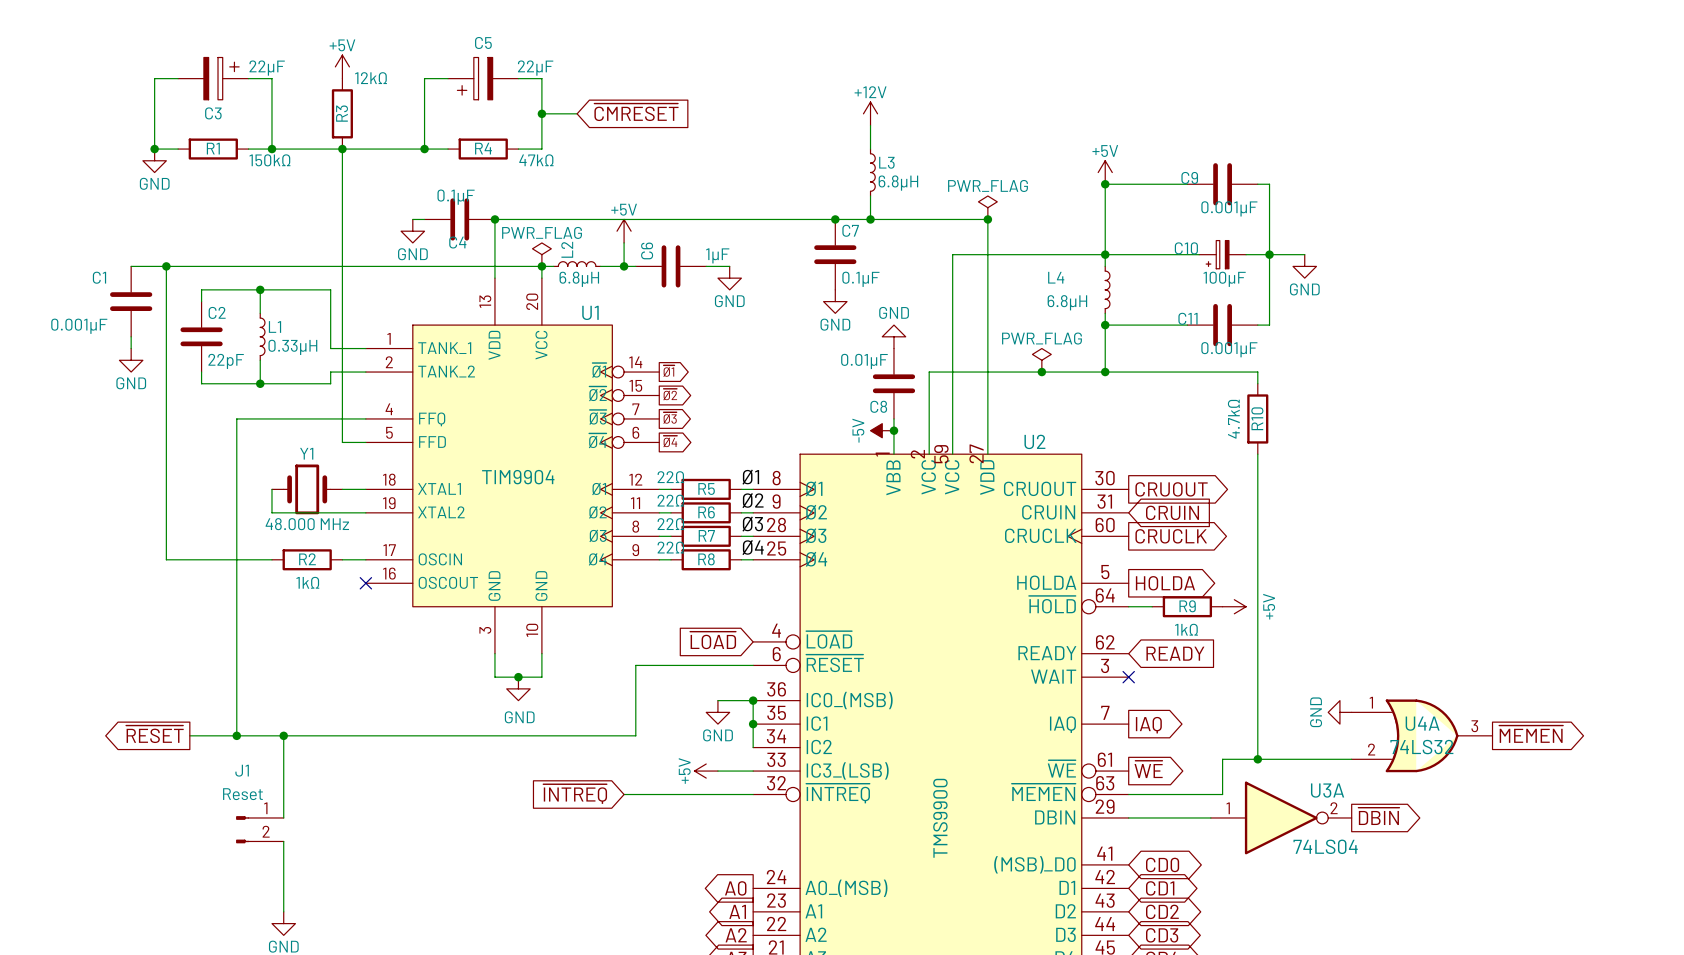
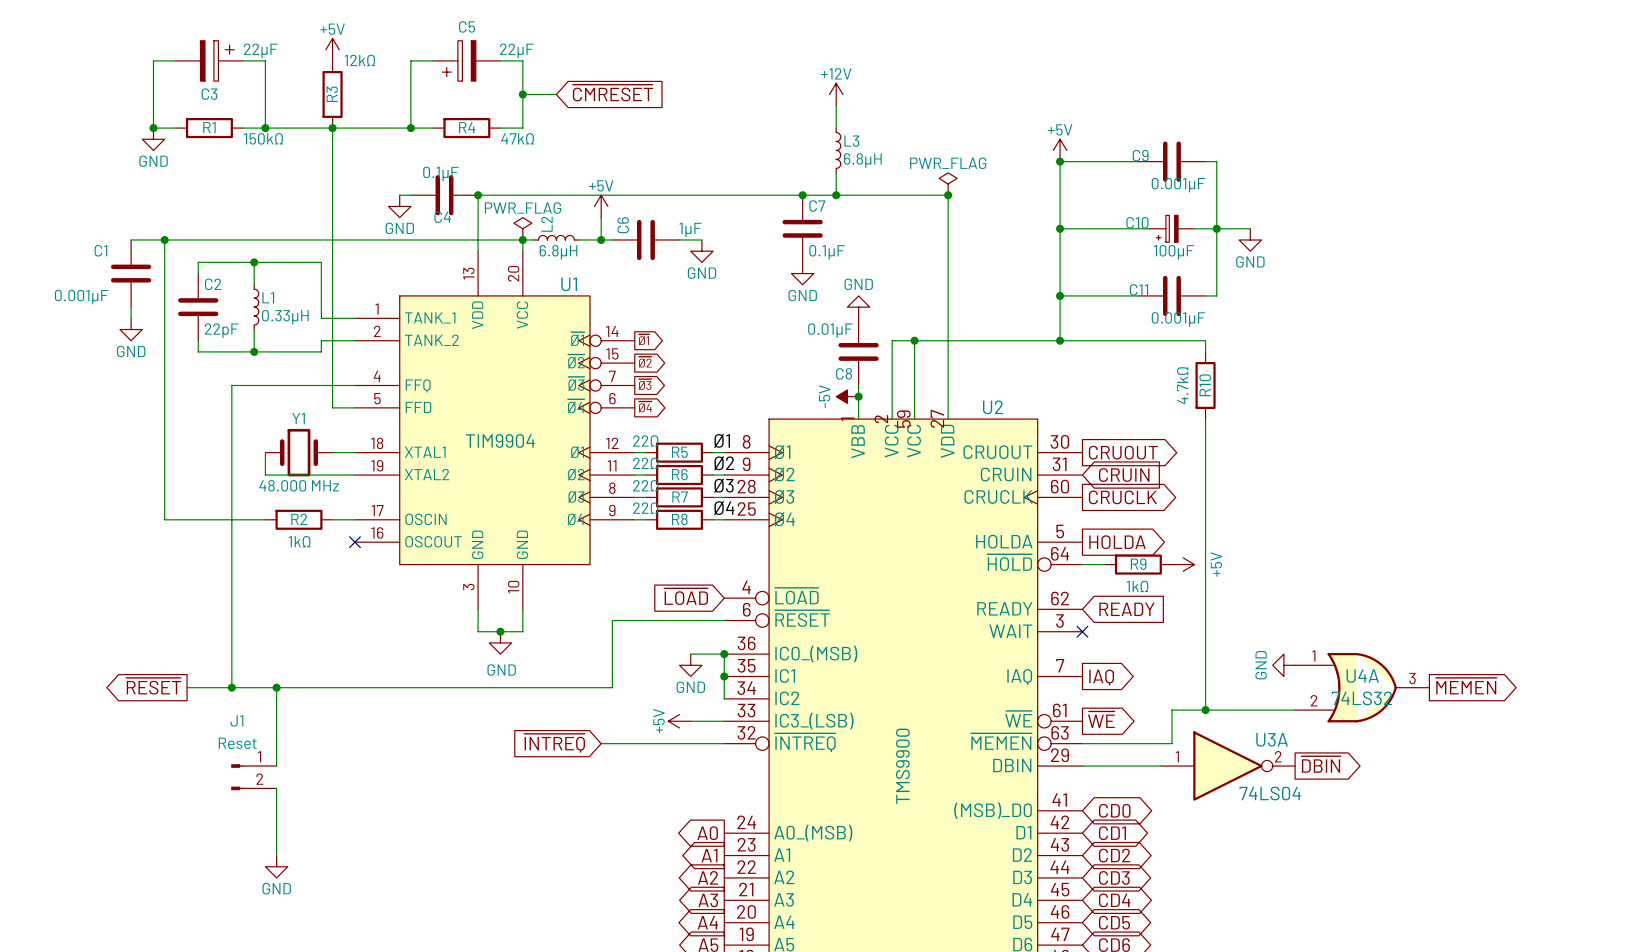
wire: (1105, 254) (952, 254) (952, 372) -> none
wire: none -> (1060, 239) (1060, 284)
L4: 6.8µH (1107, 289) -> none
power symbol: PWR_FLAG (1041, 360) -> none
junction: none -> (914, 340)
junction: (1041, 372) -> none

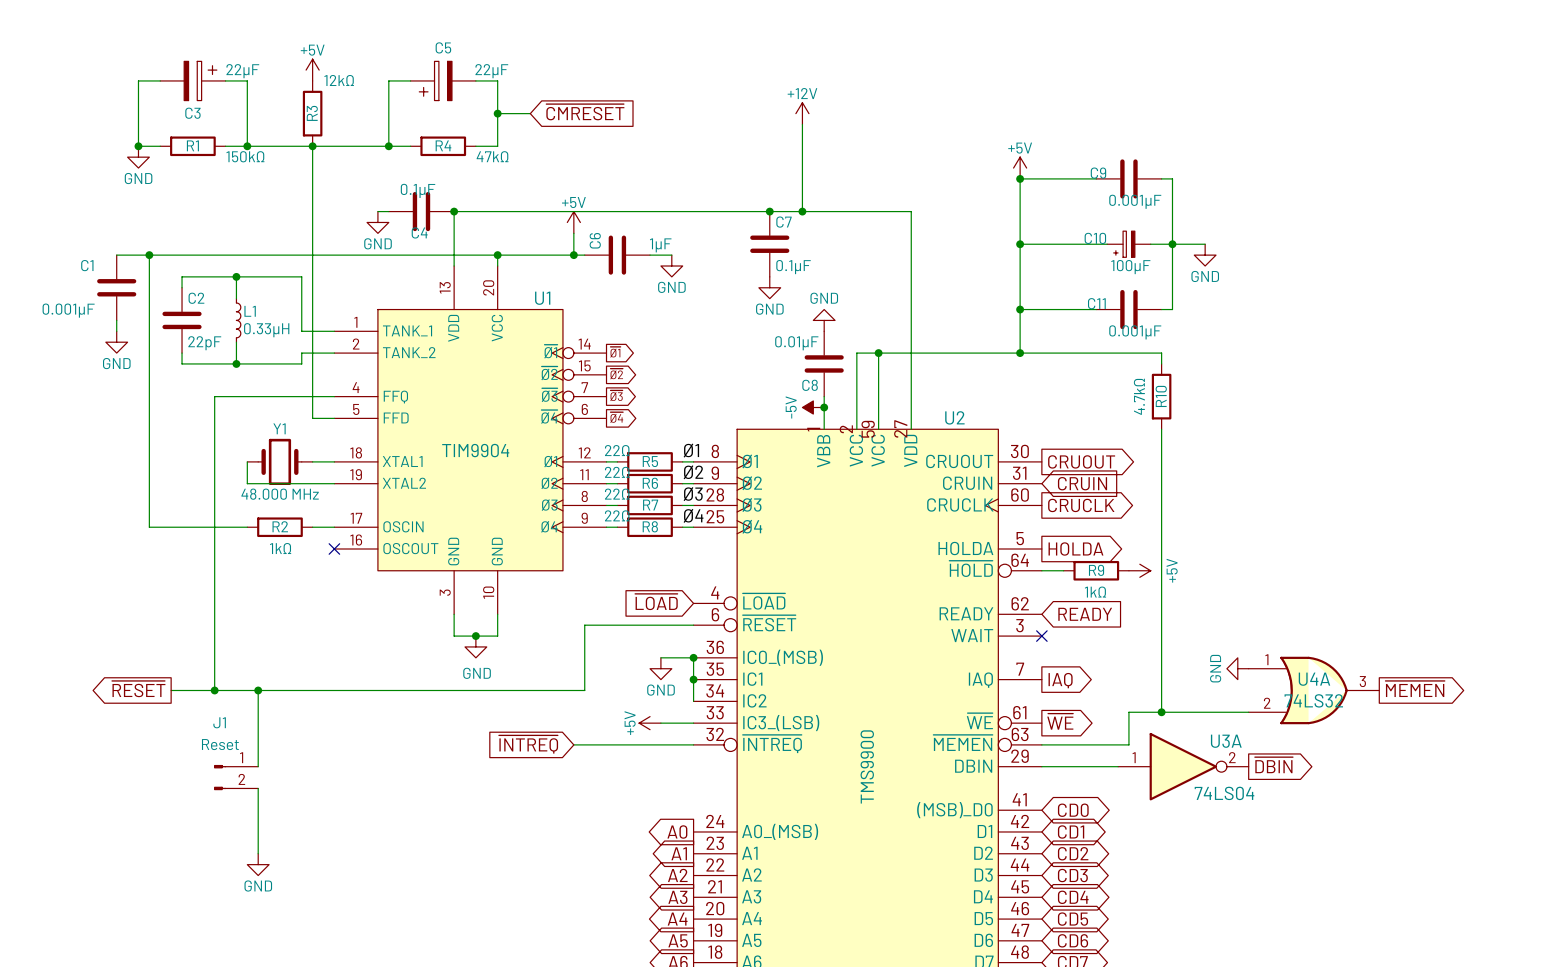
wire: none -> (802, 146) (802, 189)
L3: 6.8µH (838, 150) -> none
power symbol: PWR_FLAG (948, 184) -> none
junction: (948, 195) -> none
power symbol: PWR_FLAG (522, 228) -> none
L2: 6.8µH (556, 237) -> none
wire: none -> (508, 255) (552, 255)

